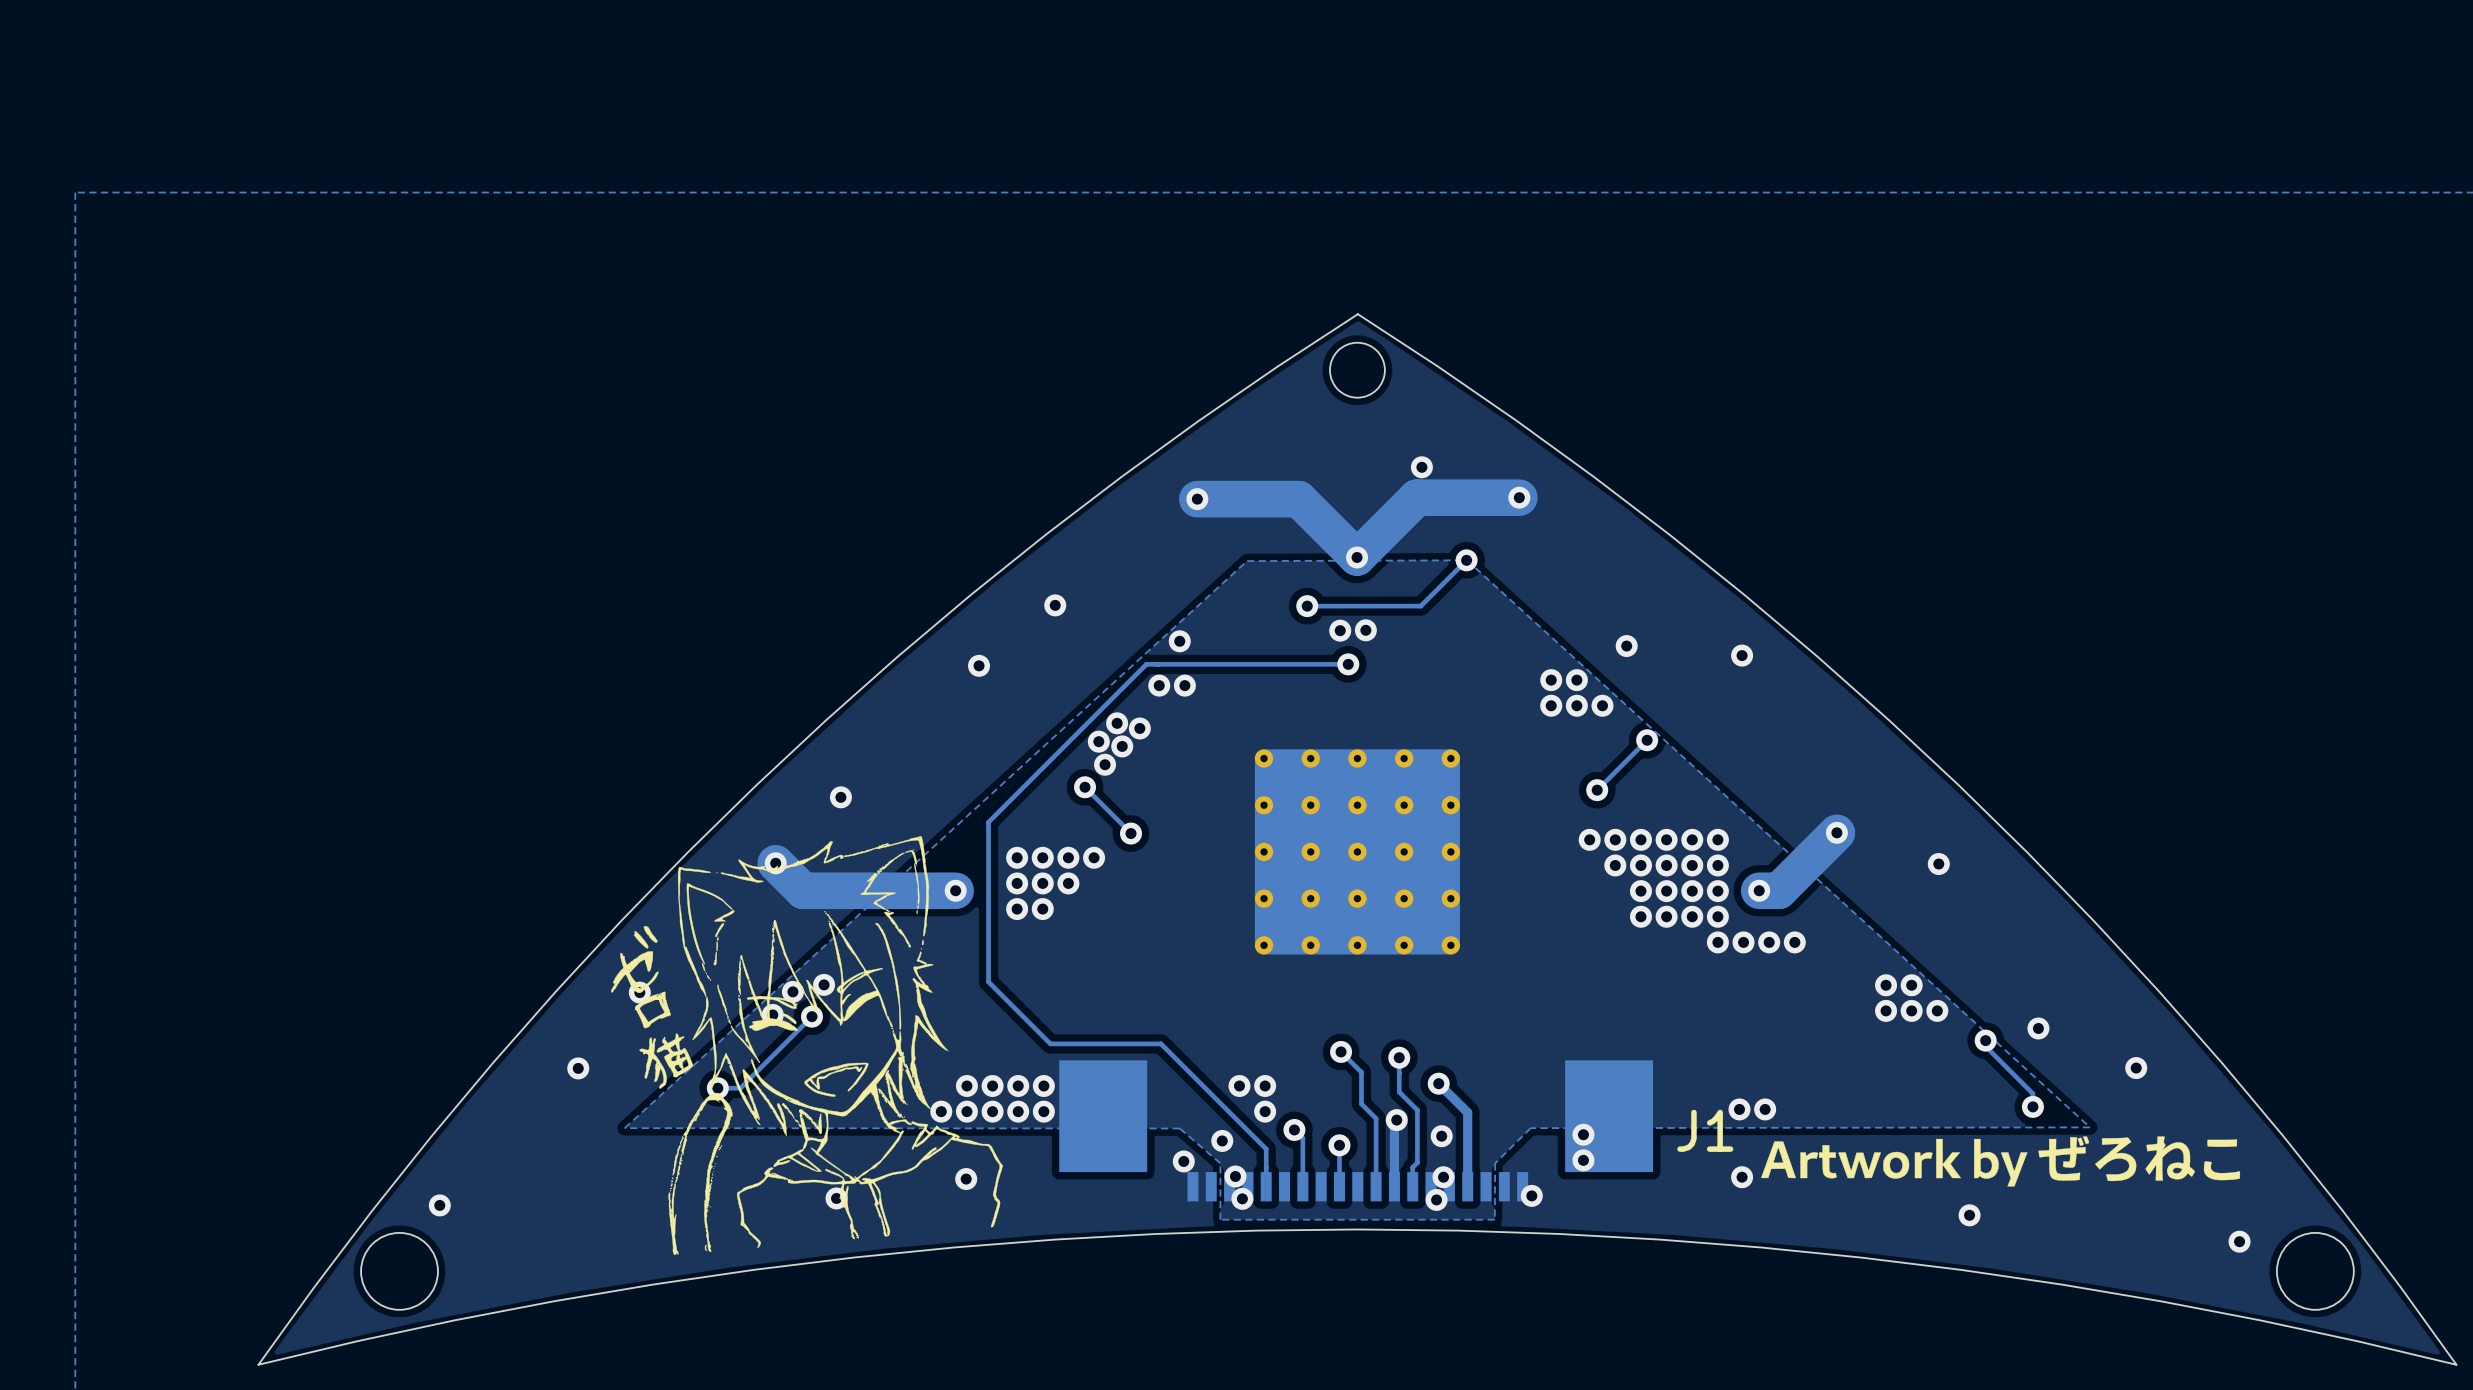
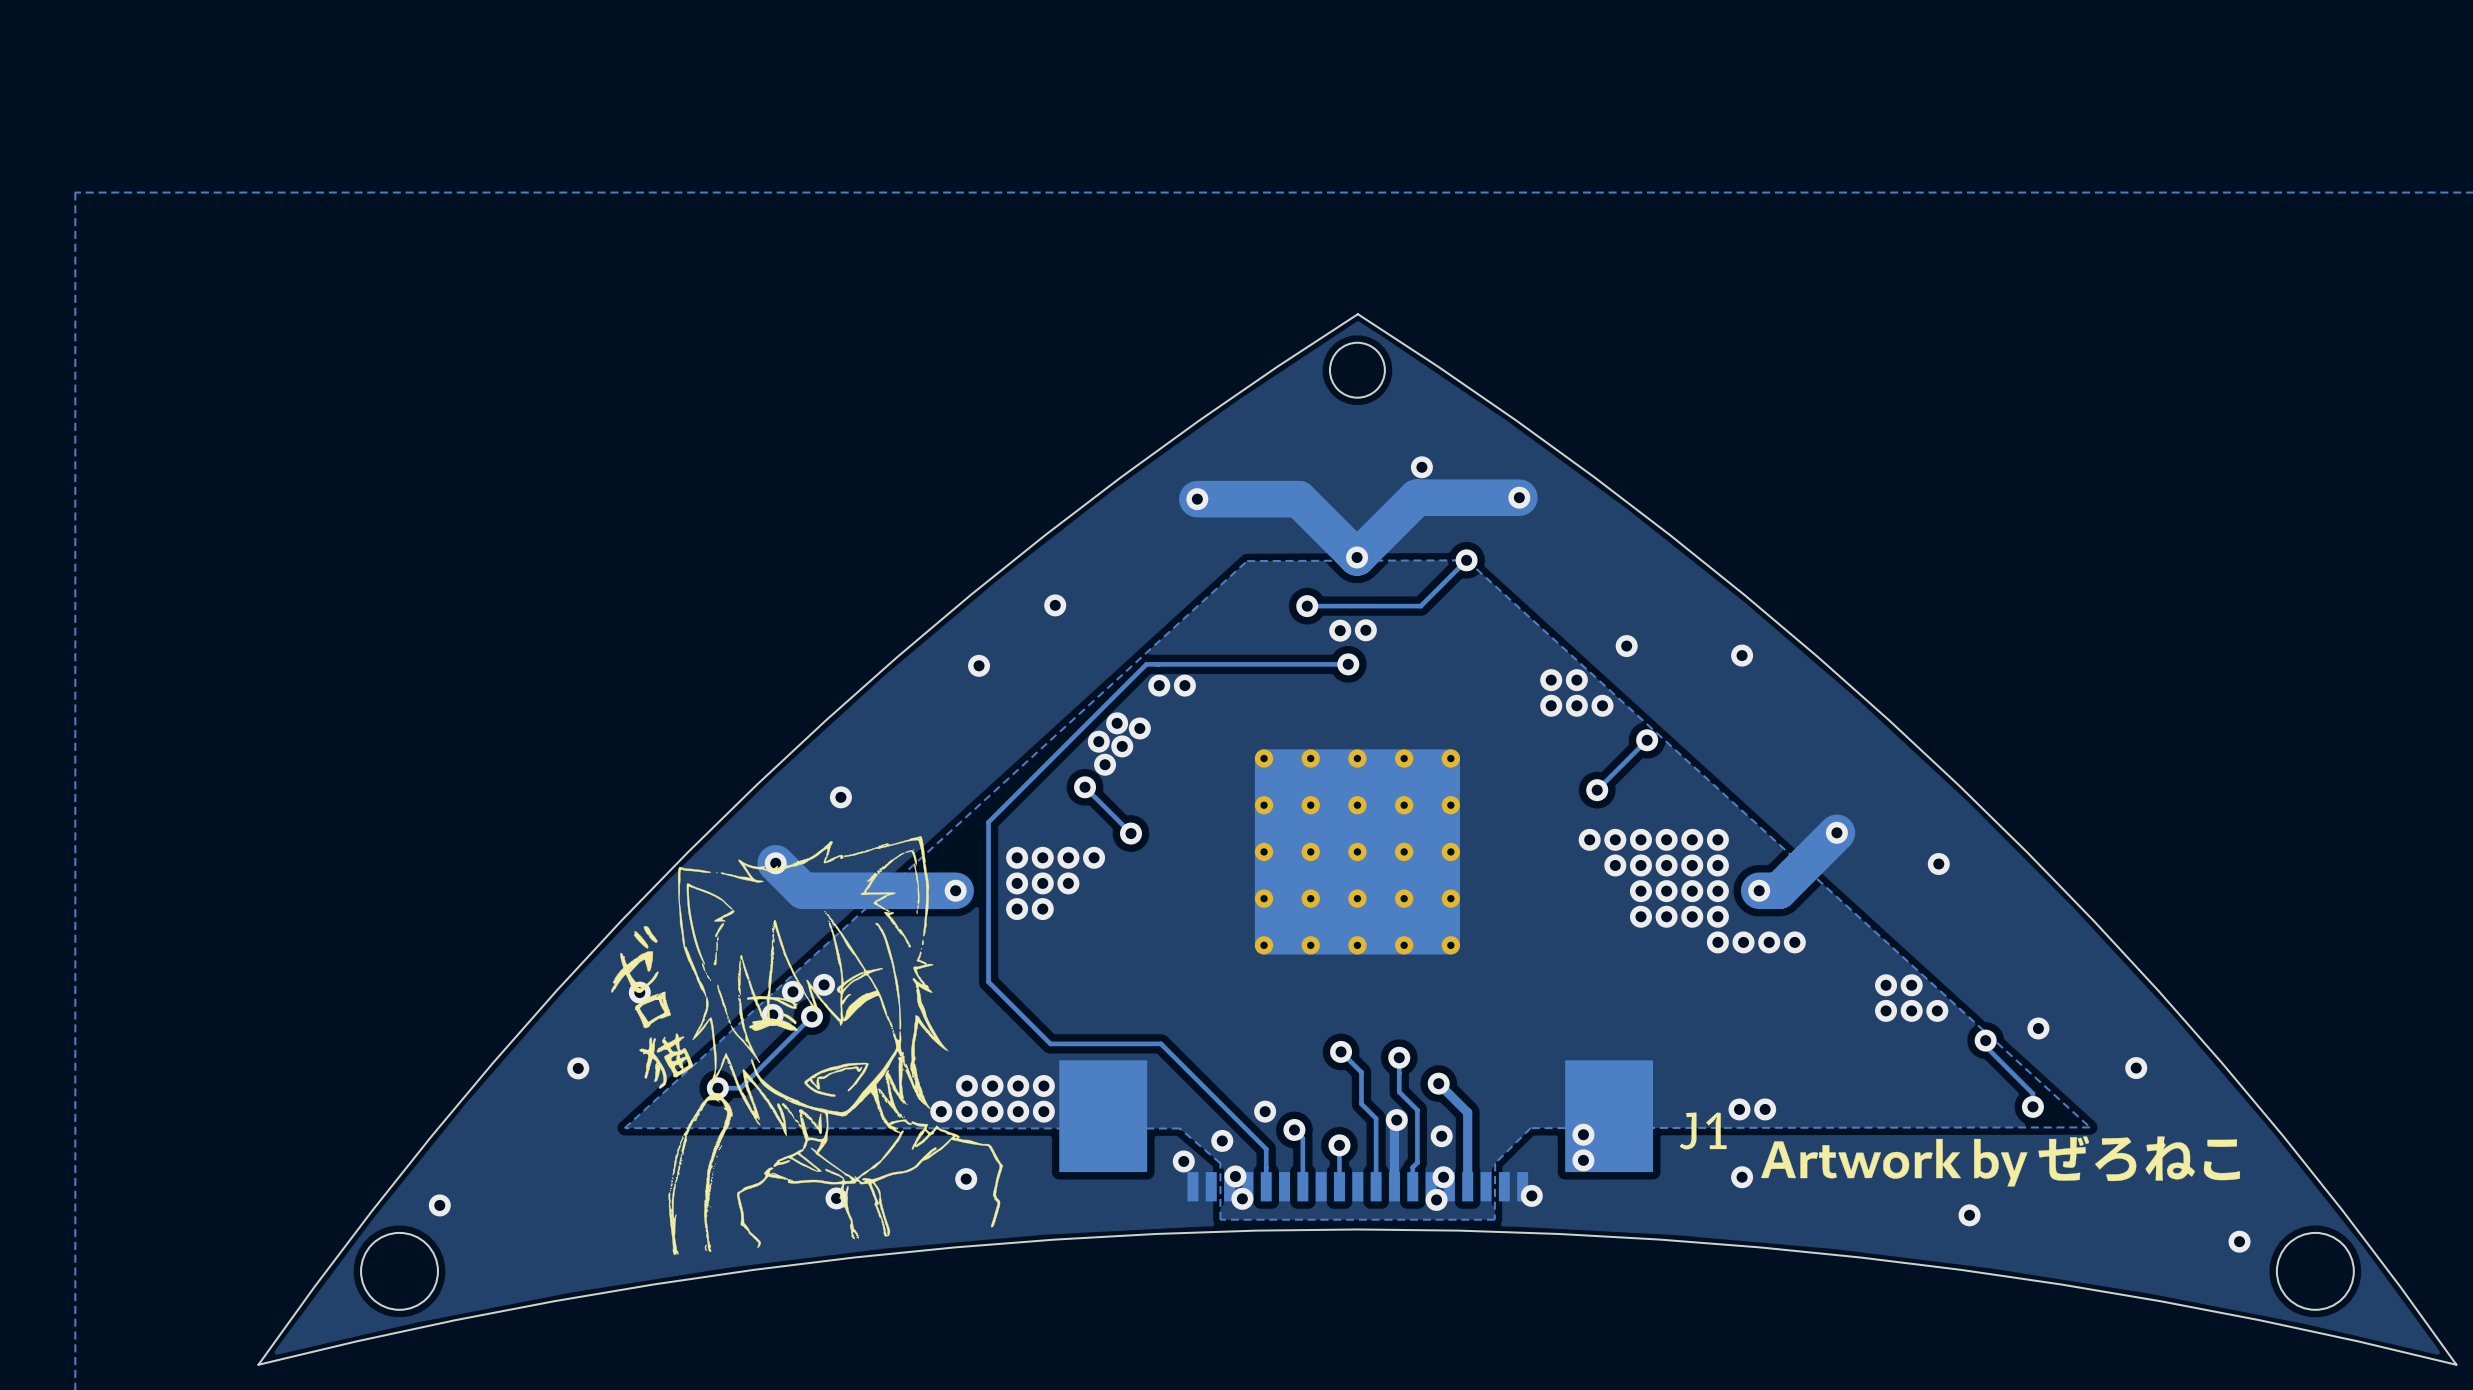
via: (1179, 641) -> none
via: (1239, 1086) -> none
via: (1265, 1086) -> none

